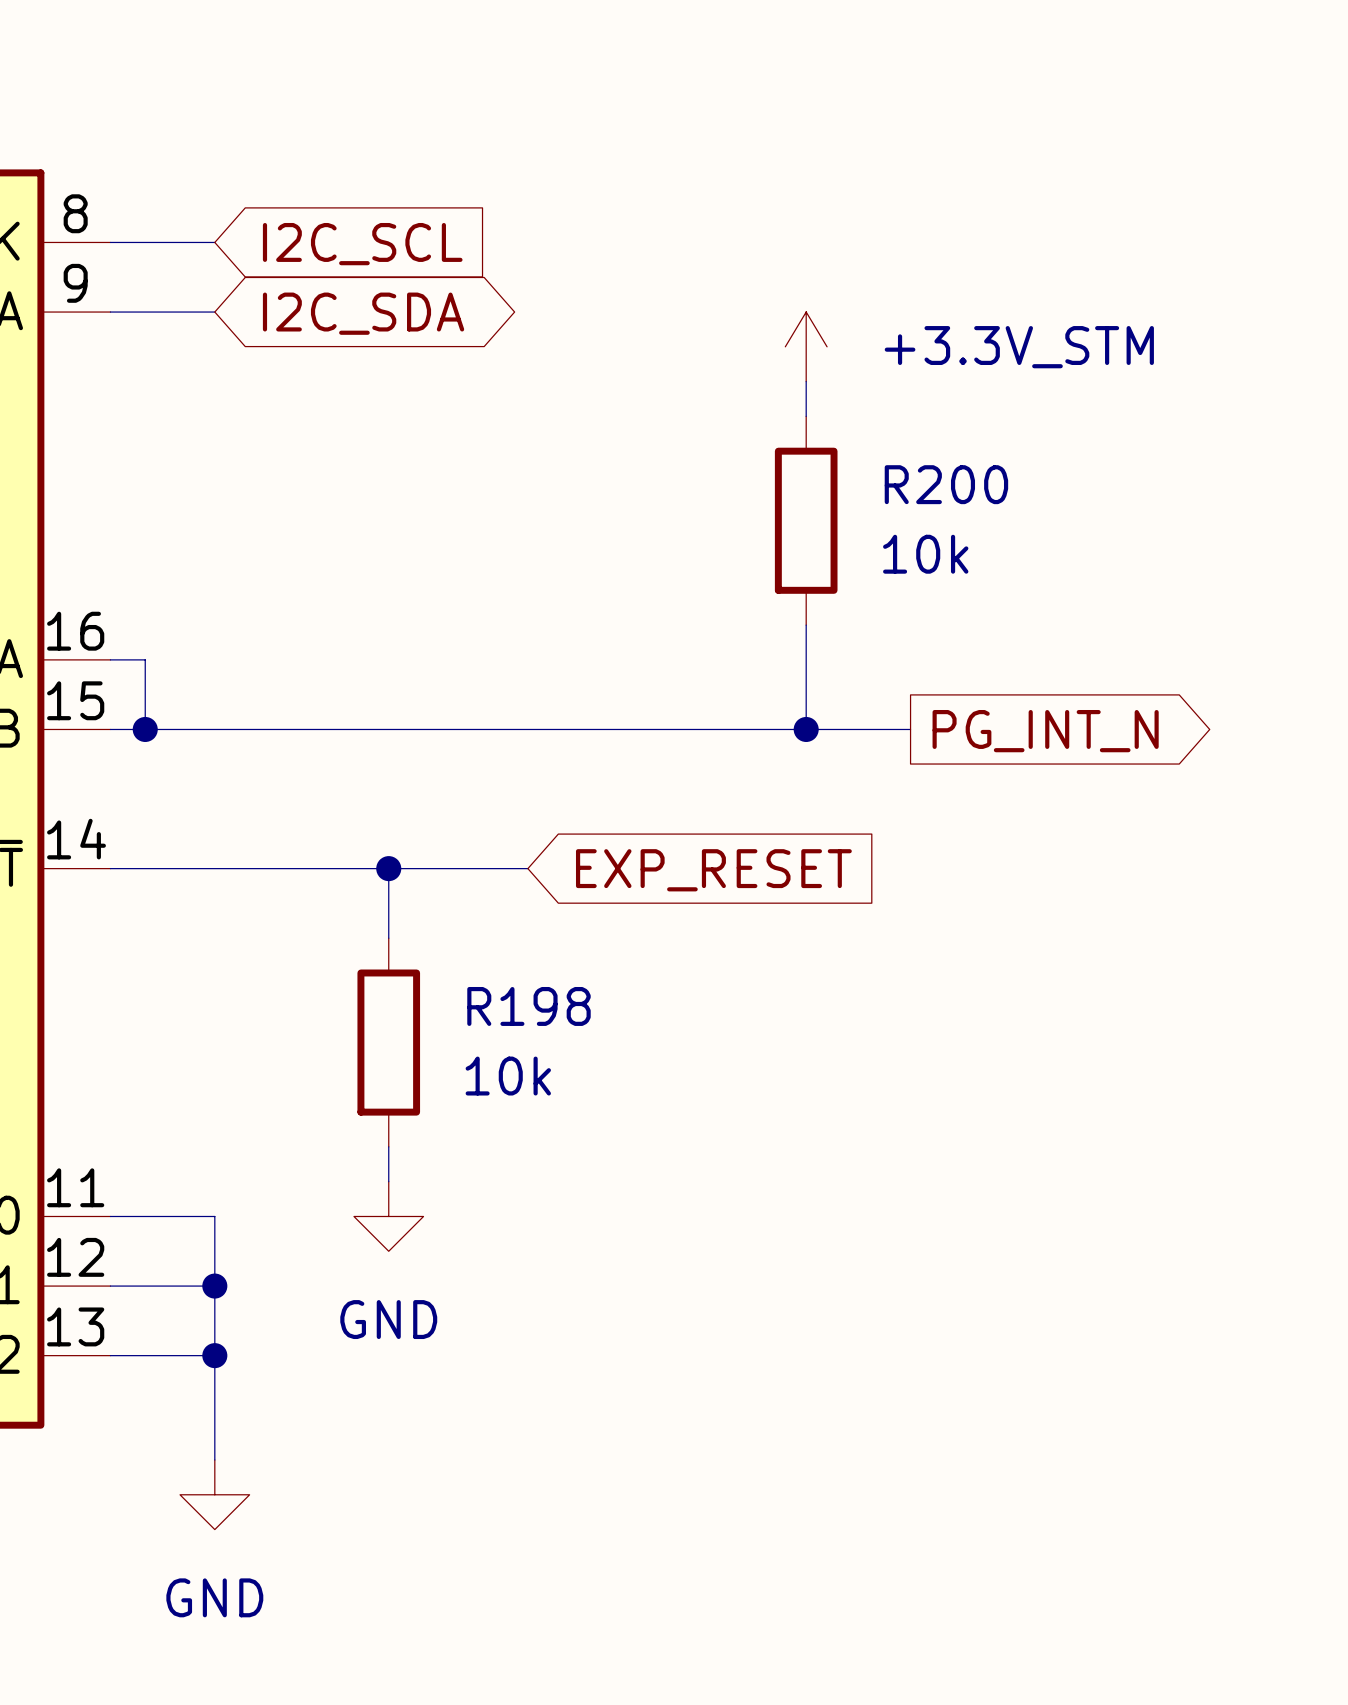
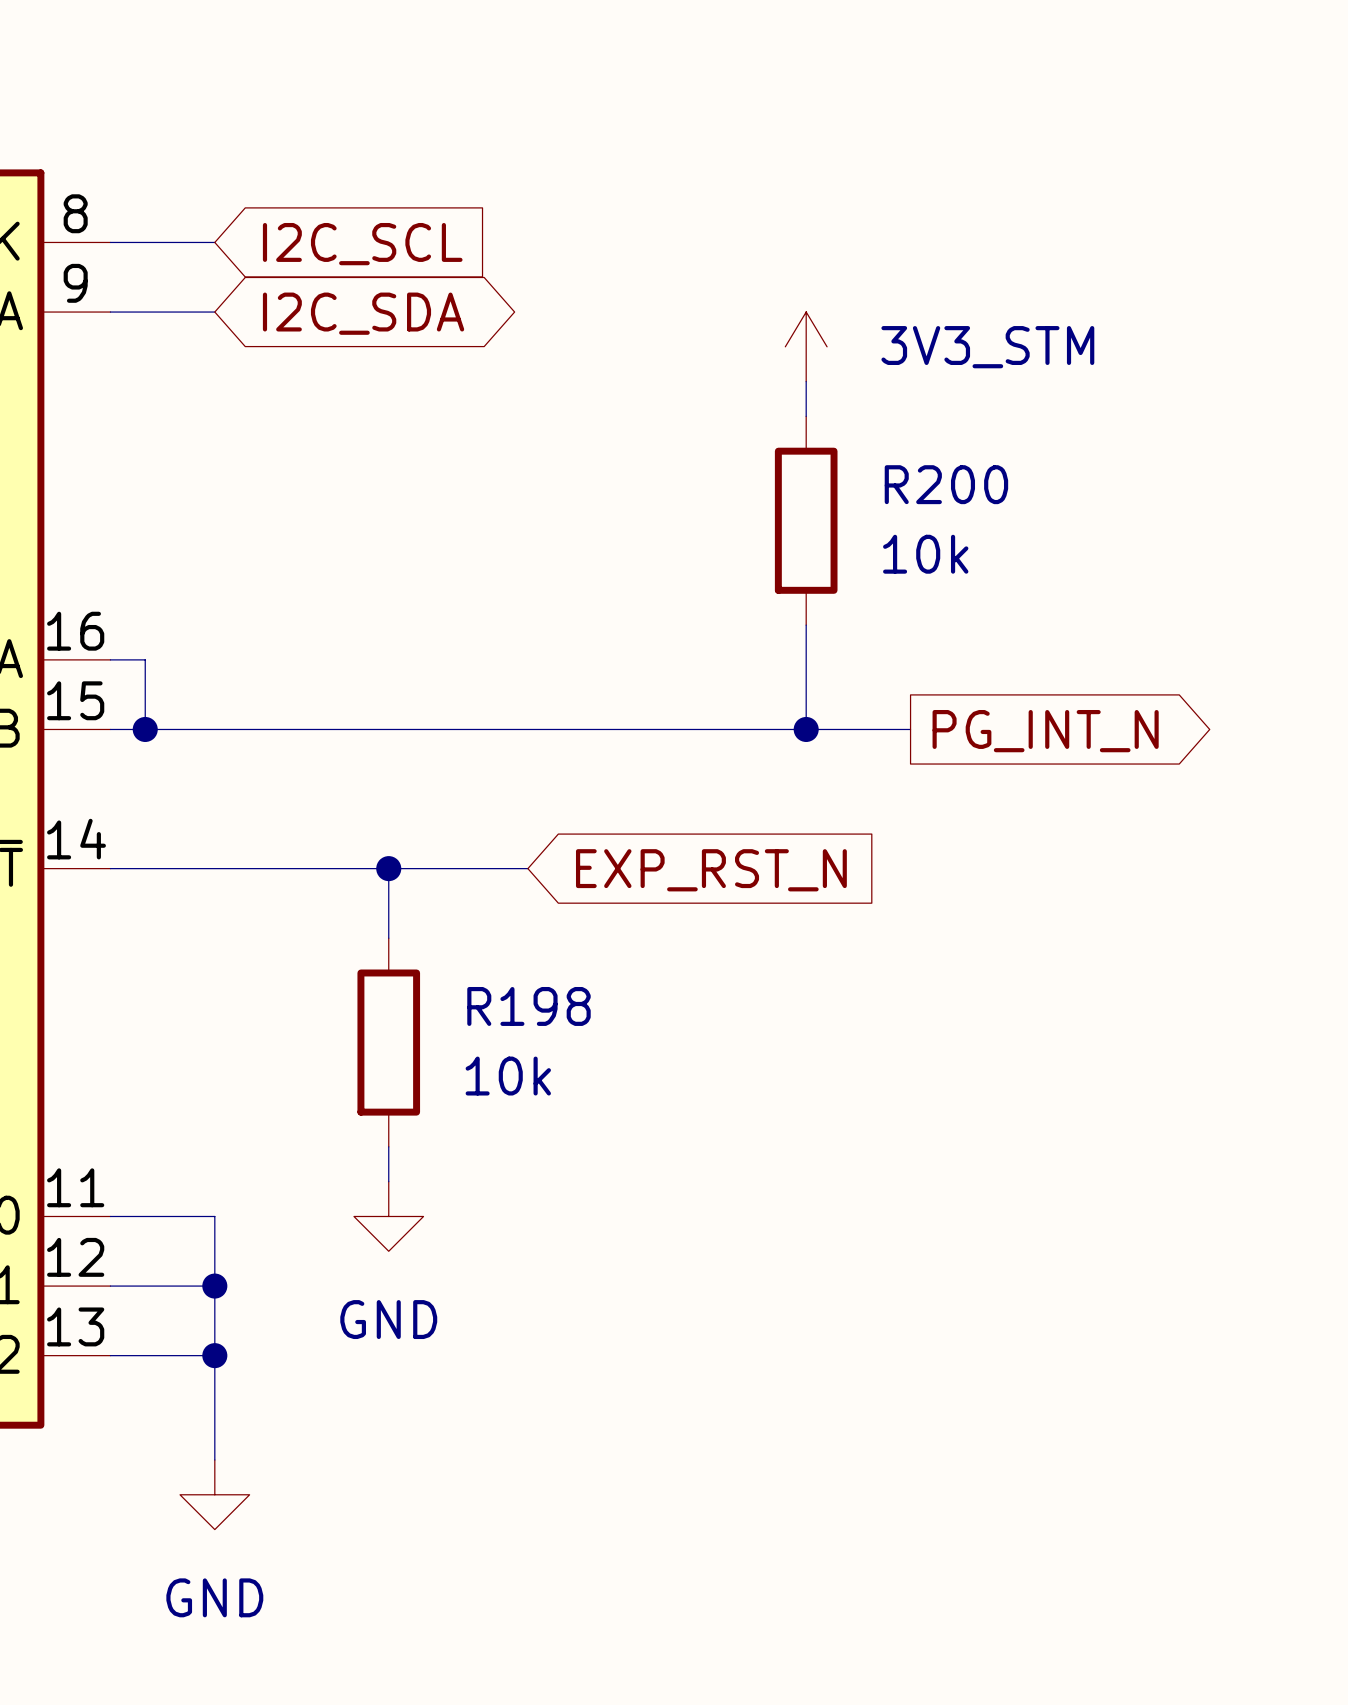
power symbol: +3.3V_STM (806, 346) -> 3V3_STM (806, 346)
global label: EXP_RESET (713, 870) -> EXP_RST_N (711, 870)

